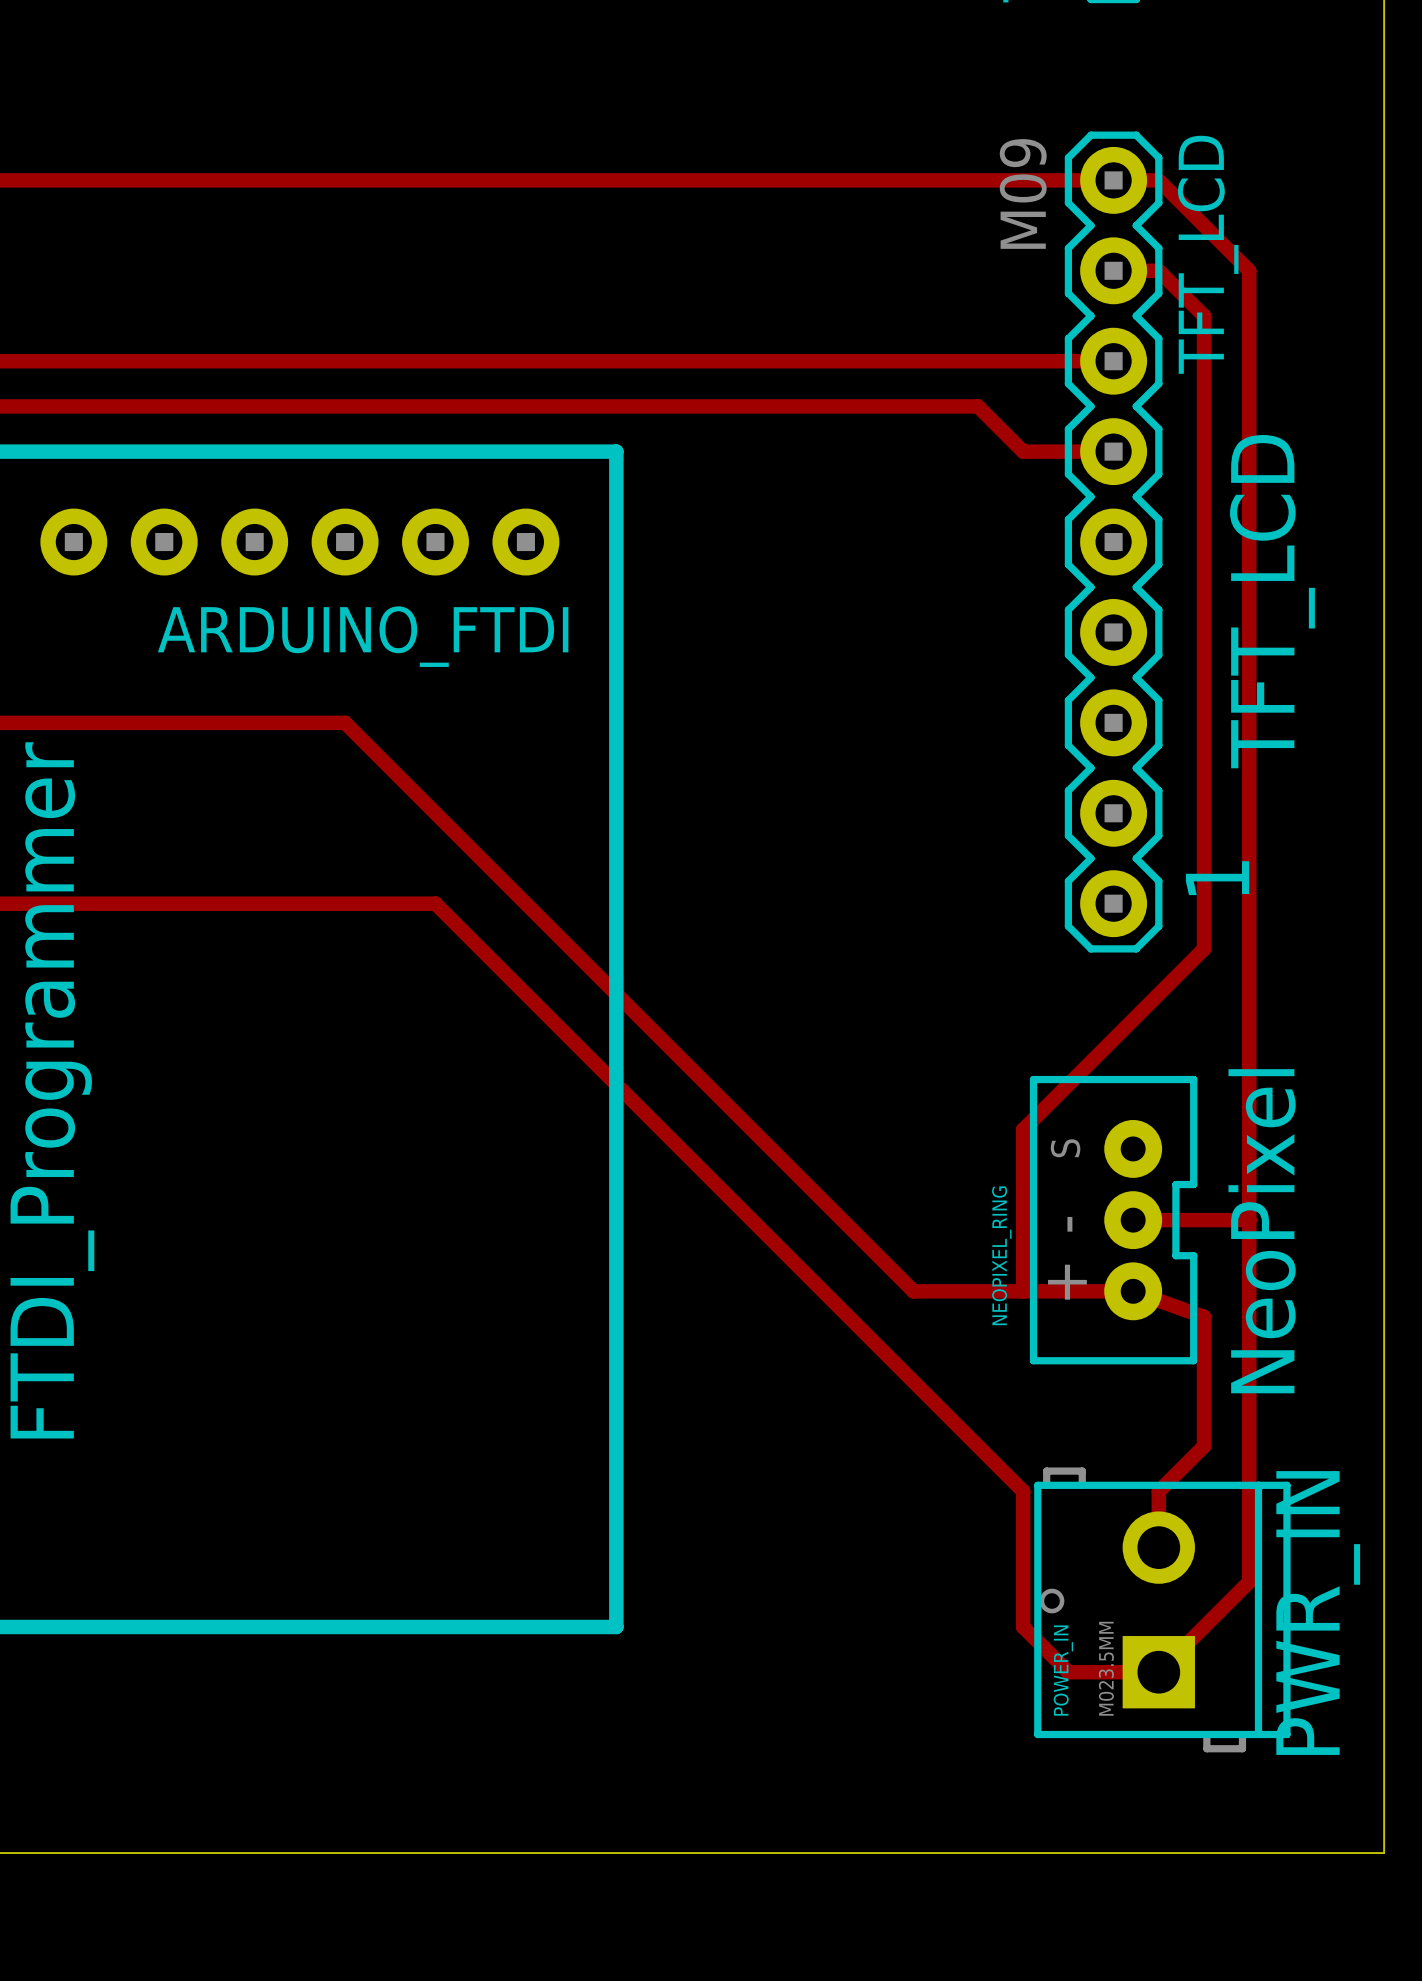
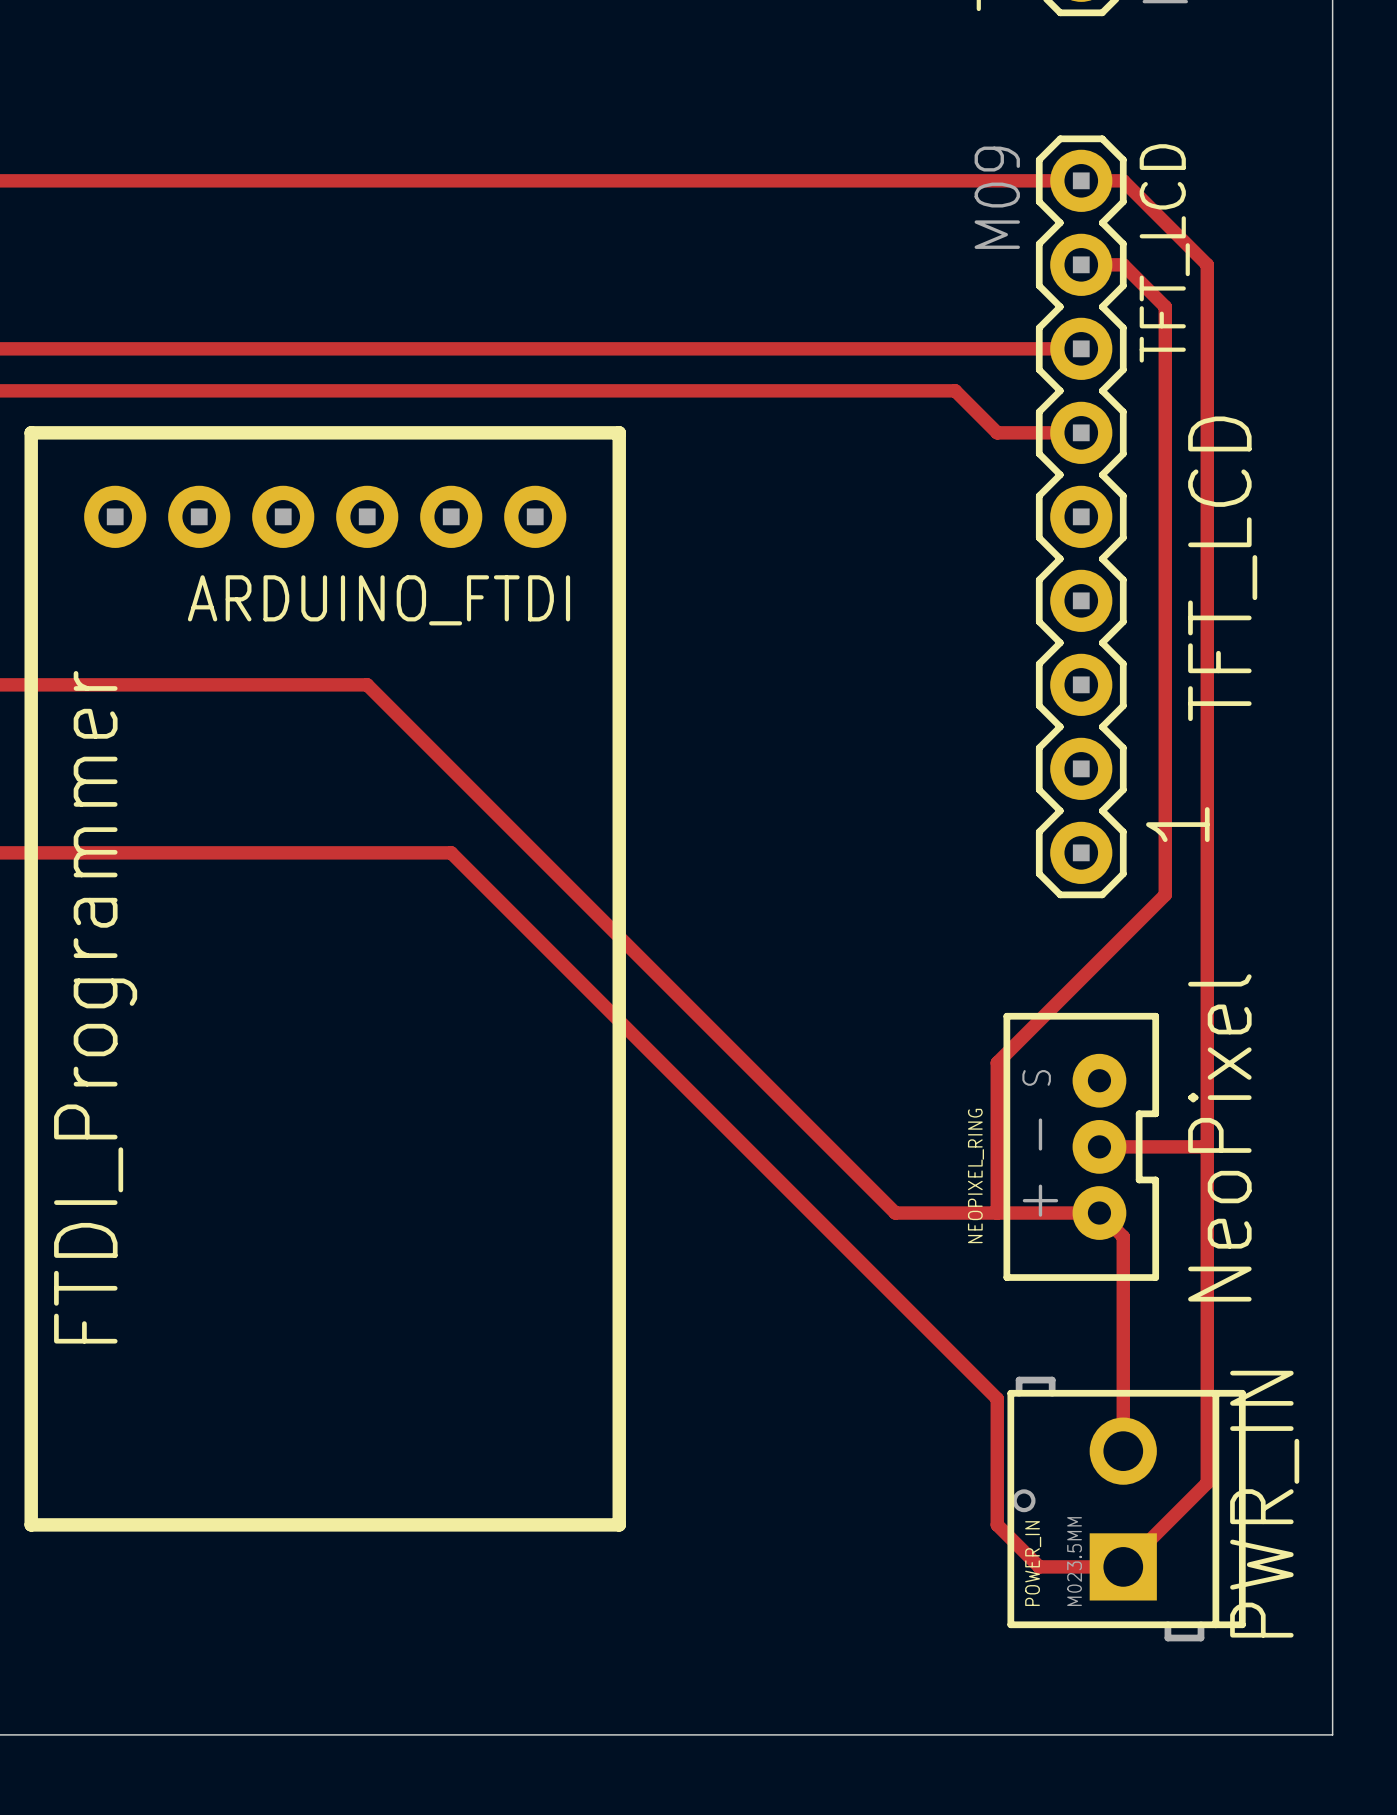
track: (1133, 1291) (1204, 1316) (1204, 1446) (1158, 1491) -> (1099, 1213) (1123, 1236) (1123, 1398)

